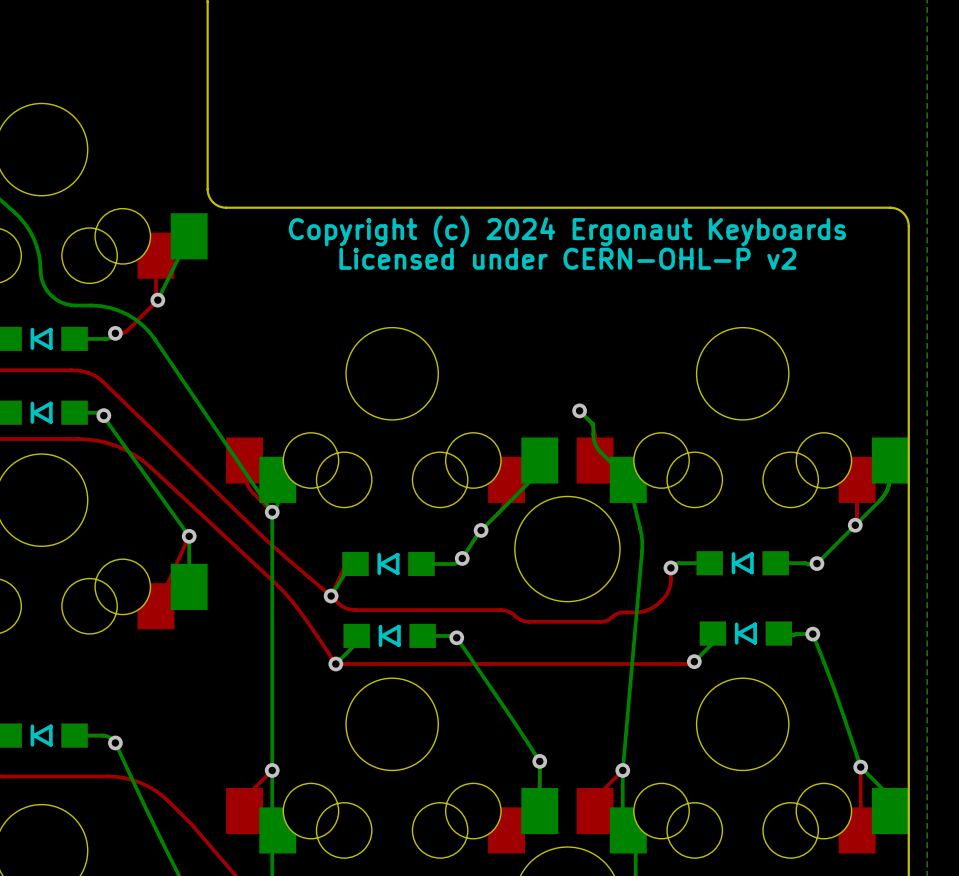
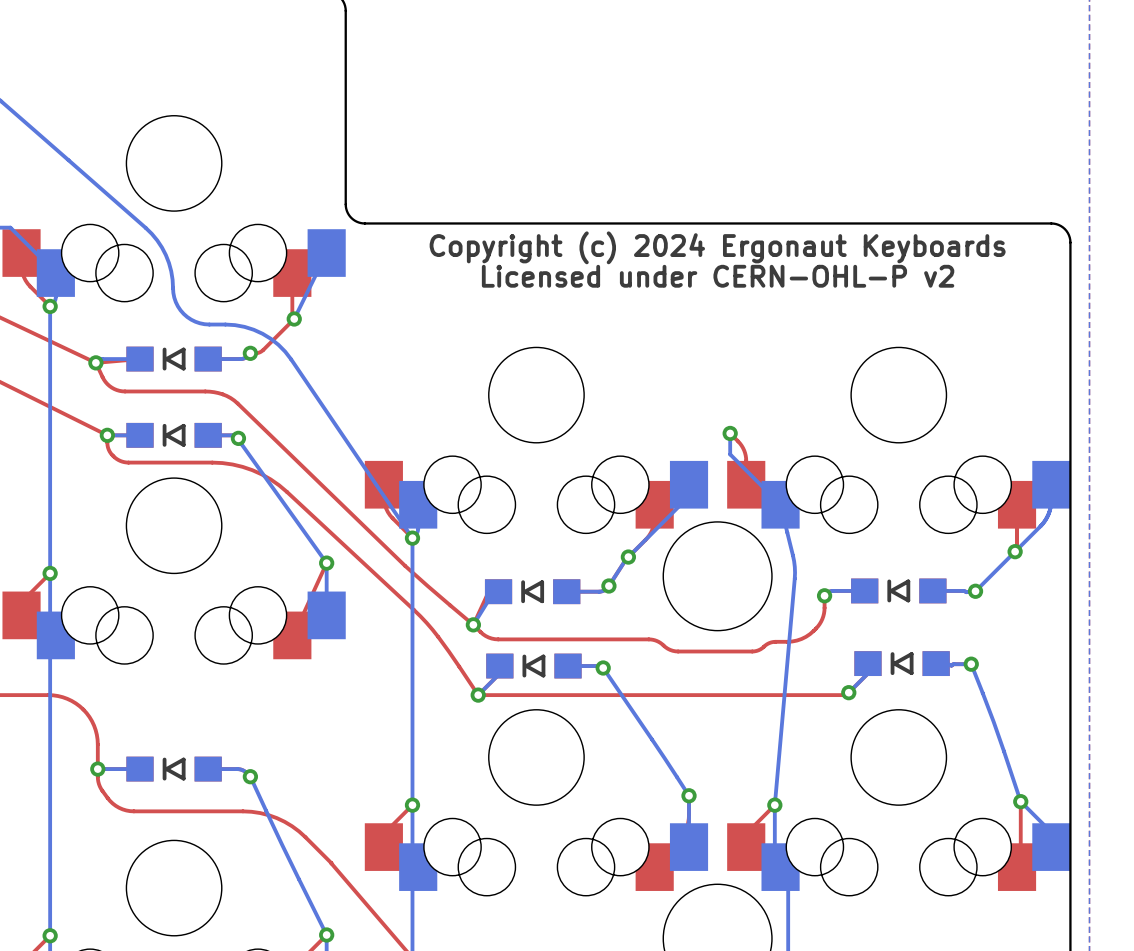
bottom track: (579, 410) (593, 423) (594, 440) (600, 452) -> (730, 433) (730, 454) (752, 476)

